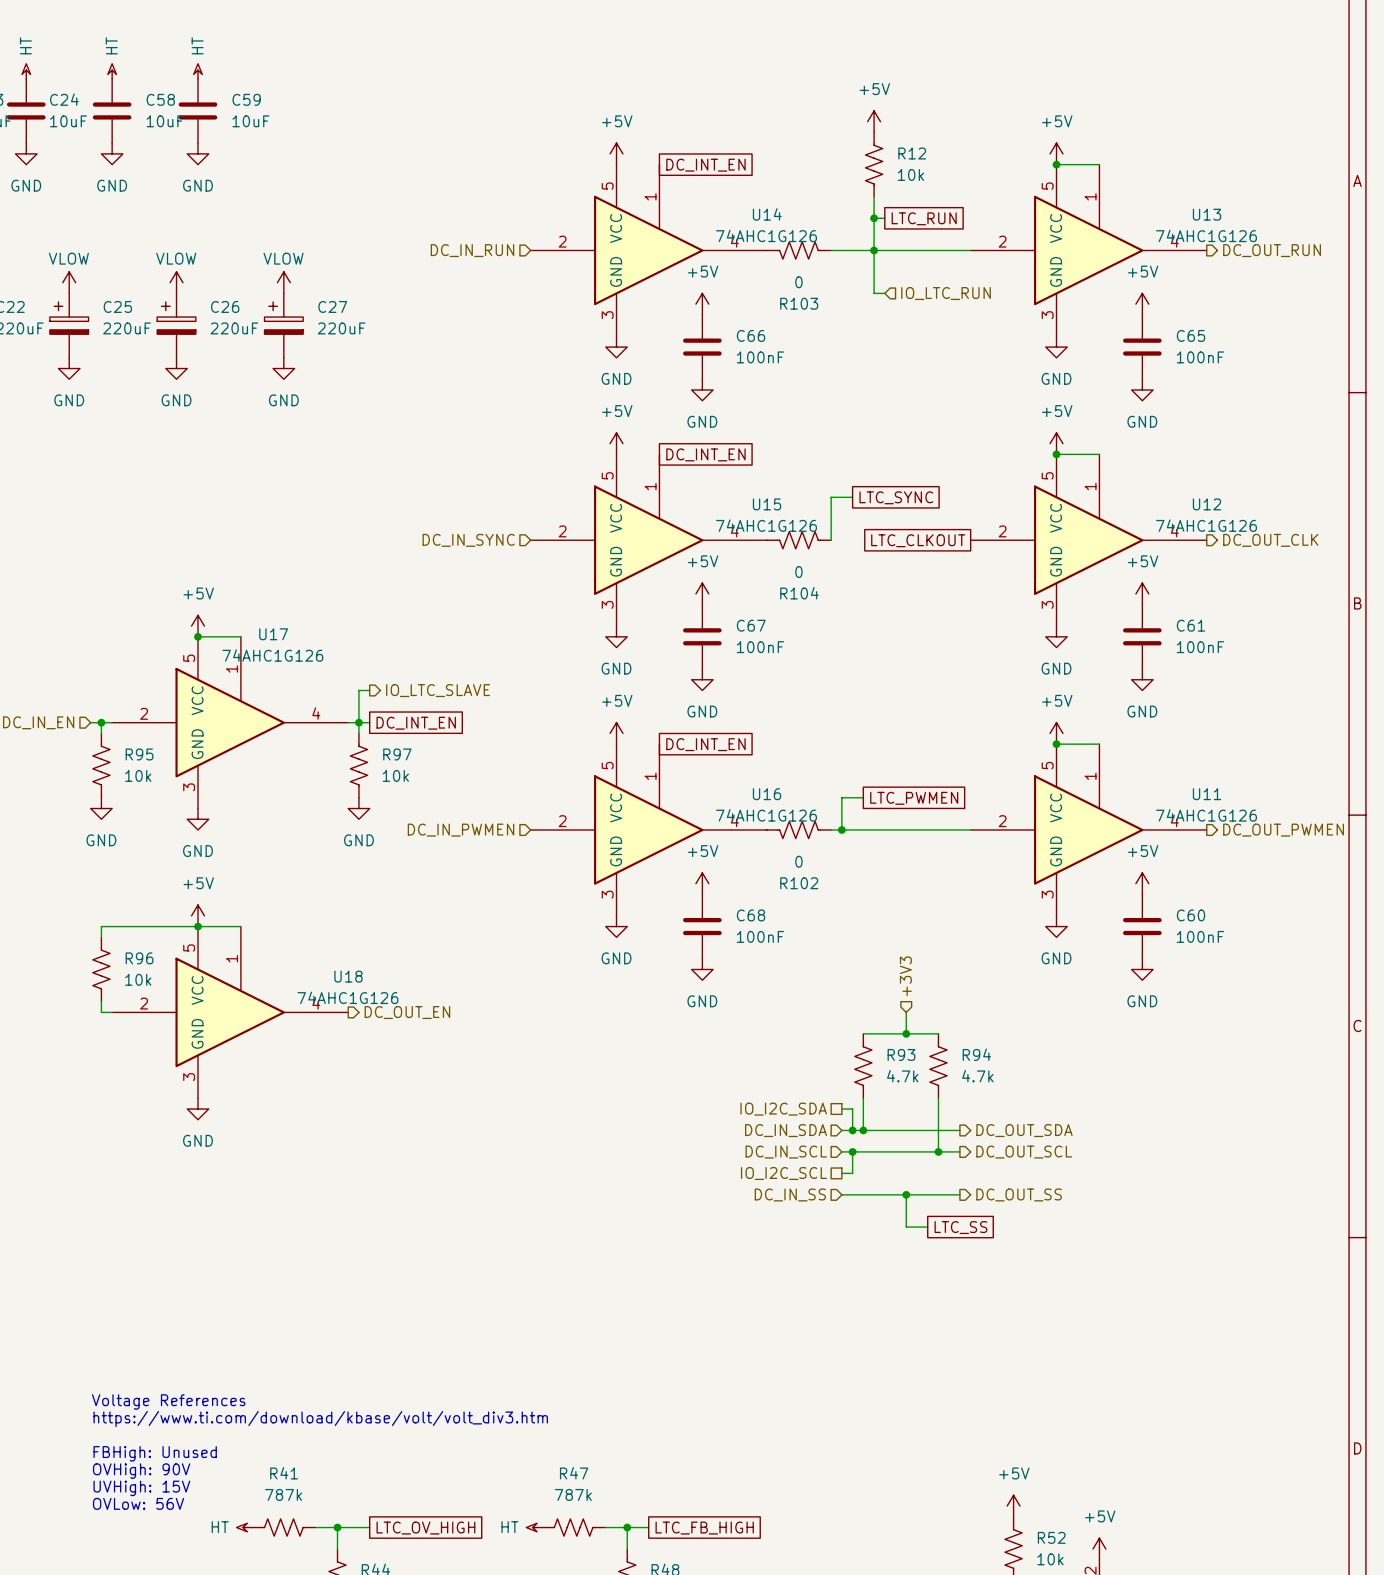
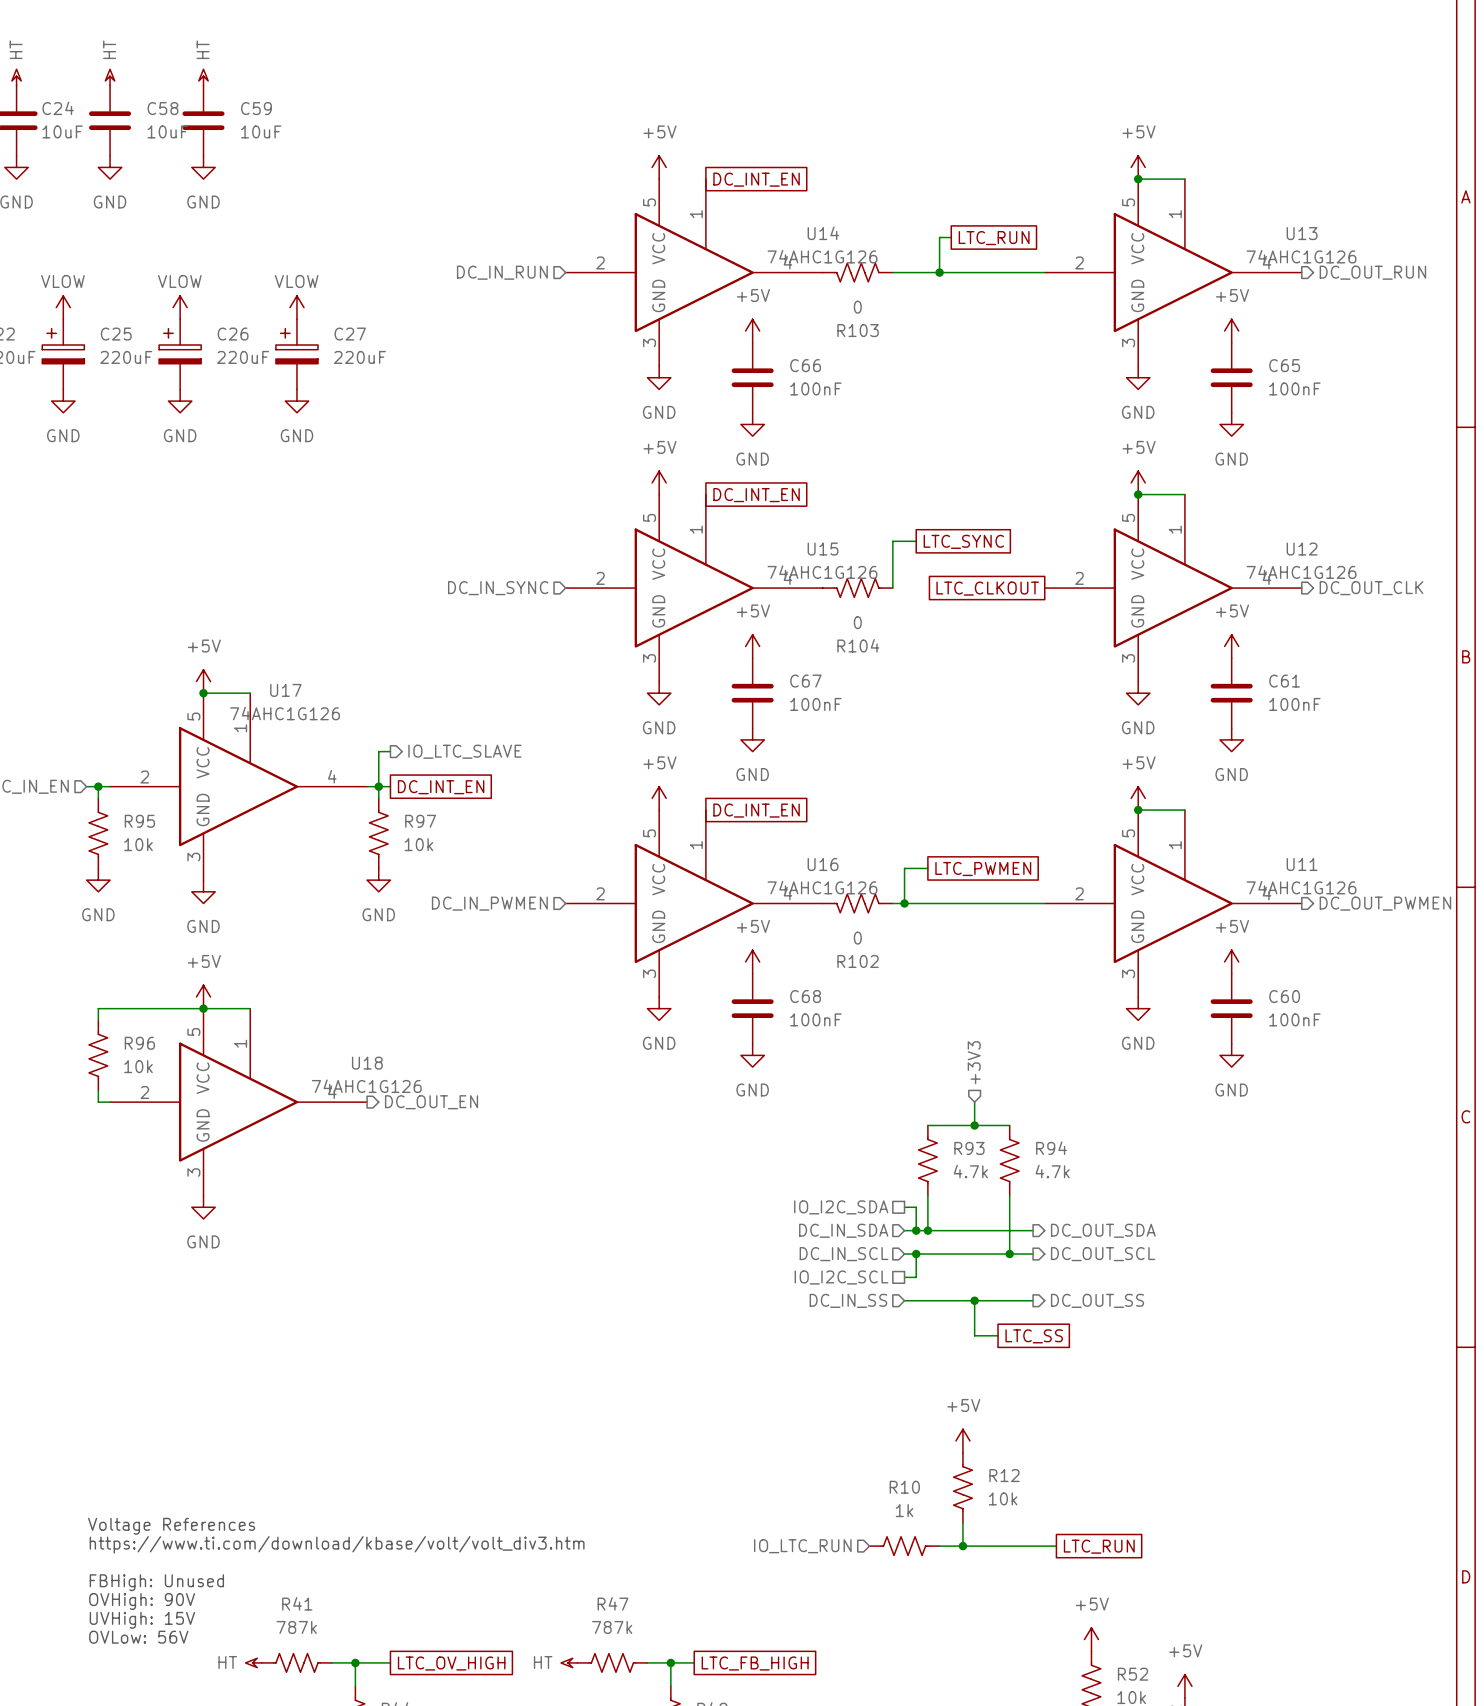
power symbol: +5V (874, 121) -> none
R12 position: (874, 164) -> (962, 1487)
wire: (874, 196) (874, 218) -> none
junction: (874, 218) -> none
wire: (874, 250) (874, 293) (884, 293) -> none
hierarchical label: IO_LTC_RUN (946, 293) -> none
power symbol: none -> +5V (962, 1440)
wire: none -> (962, 1522) (962, 1546)
hierarchical label: none -> IO_LTC_RUN (802, 1546)
R10: none -> 1k (904, 1546)
wire: none -> (939, 1546) (1056, 1546)
junction: none -> (962, 1546)
global label: none -> LTC_RUN (1099, 1546)

